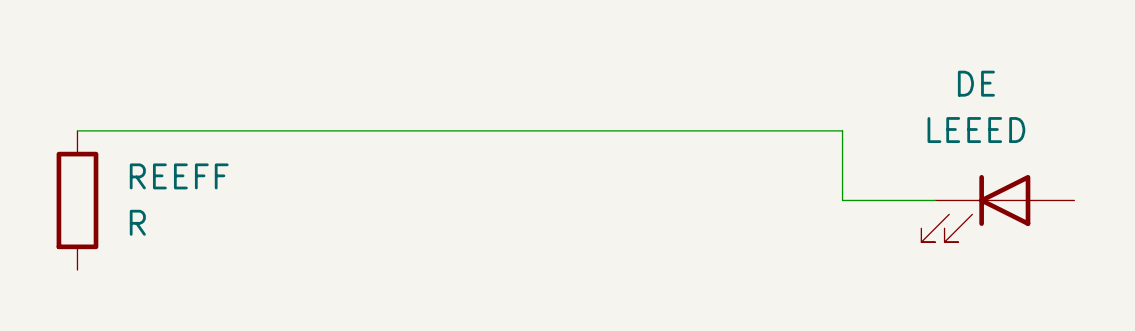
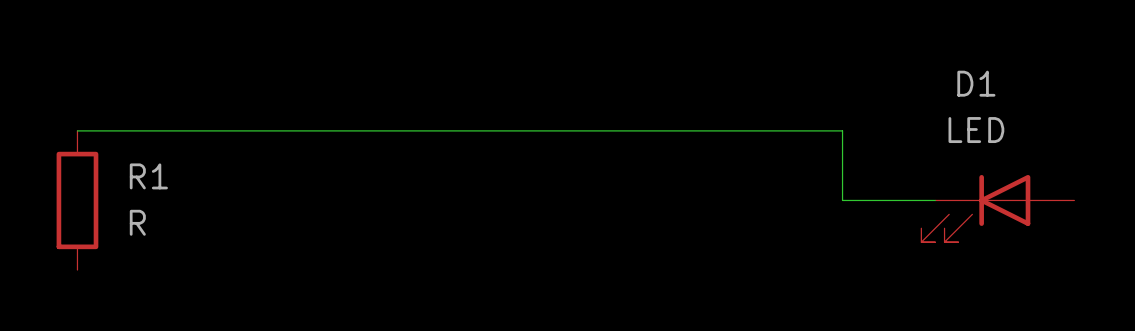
DE name: DE (976, 83) -> D1 (976, 83)
DE value: LEEED (976, 130) -> LED (976, 130)
REEFF name: REEFF (179, 176) -> R1 (148, 176)

